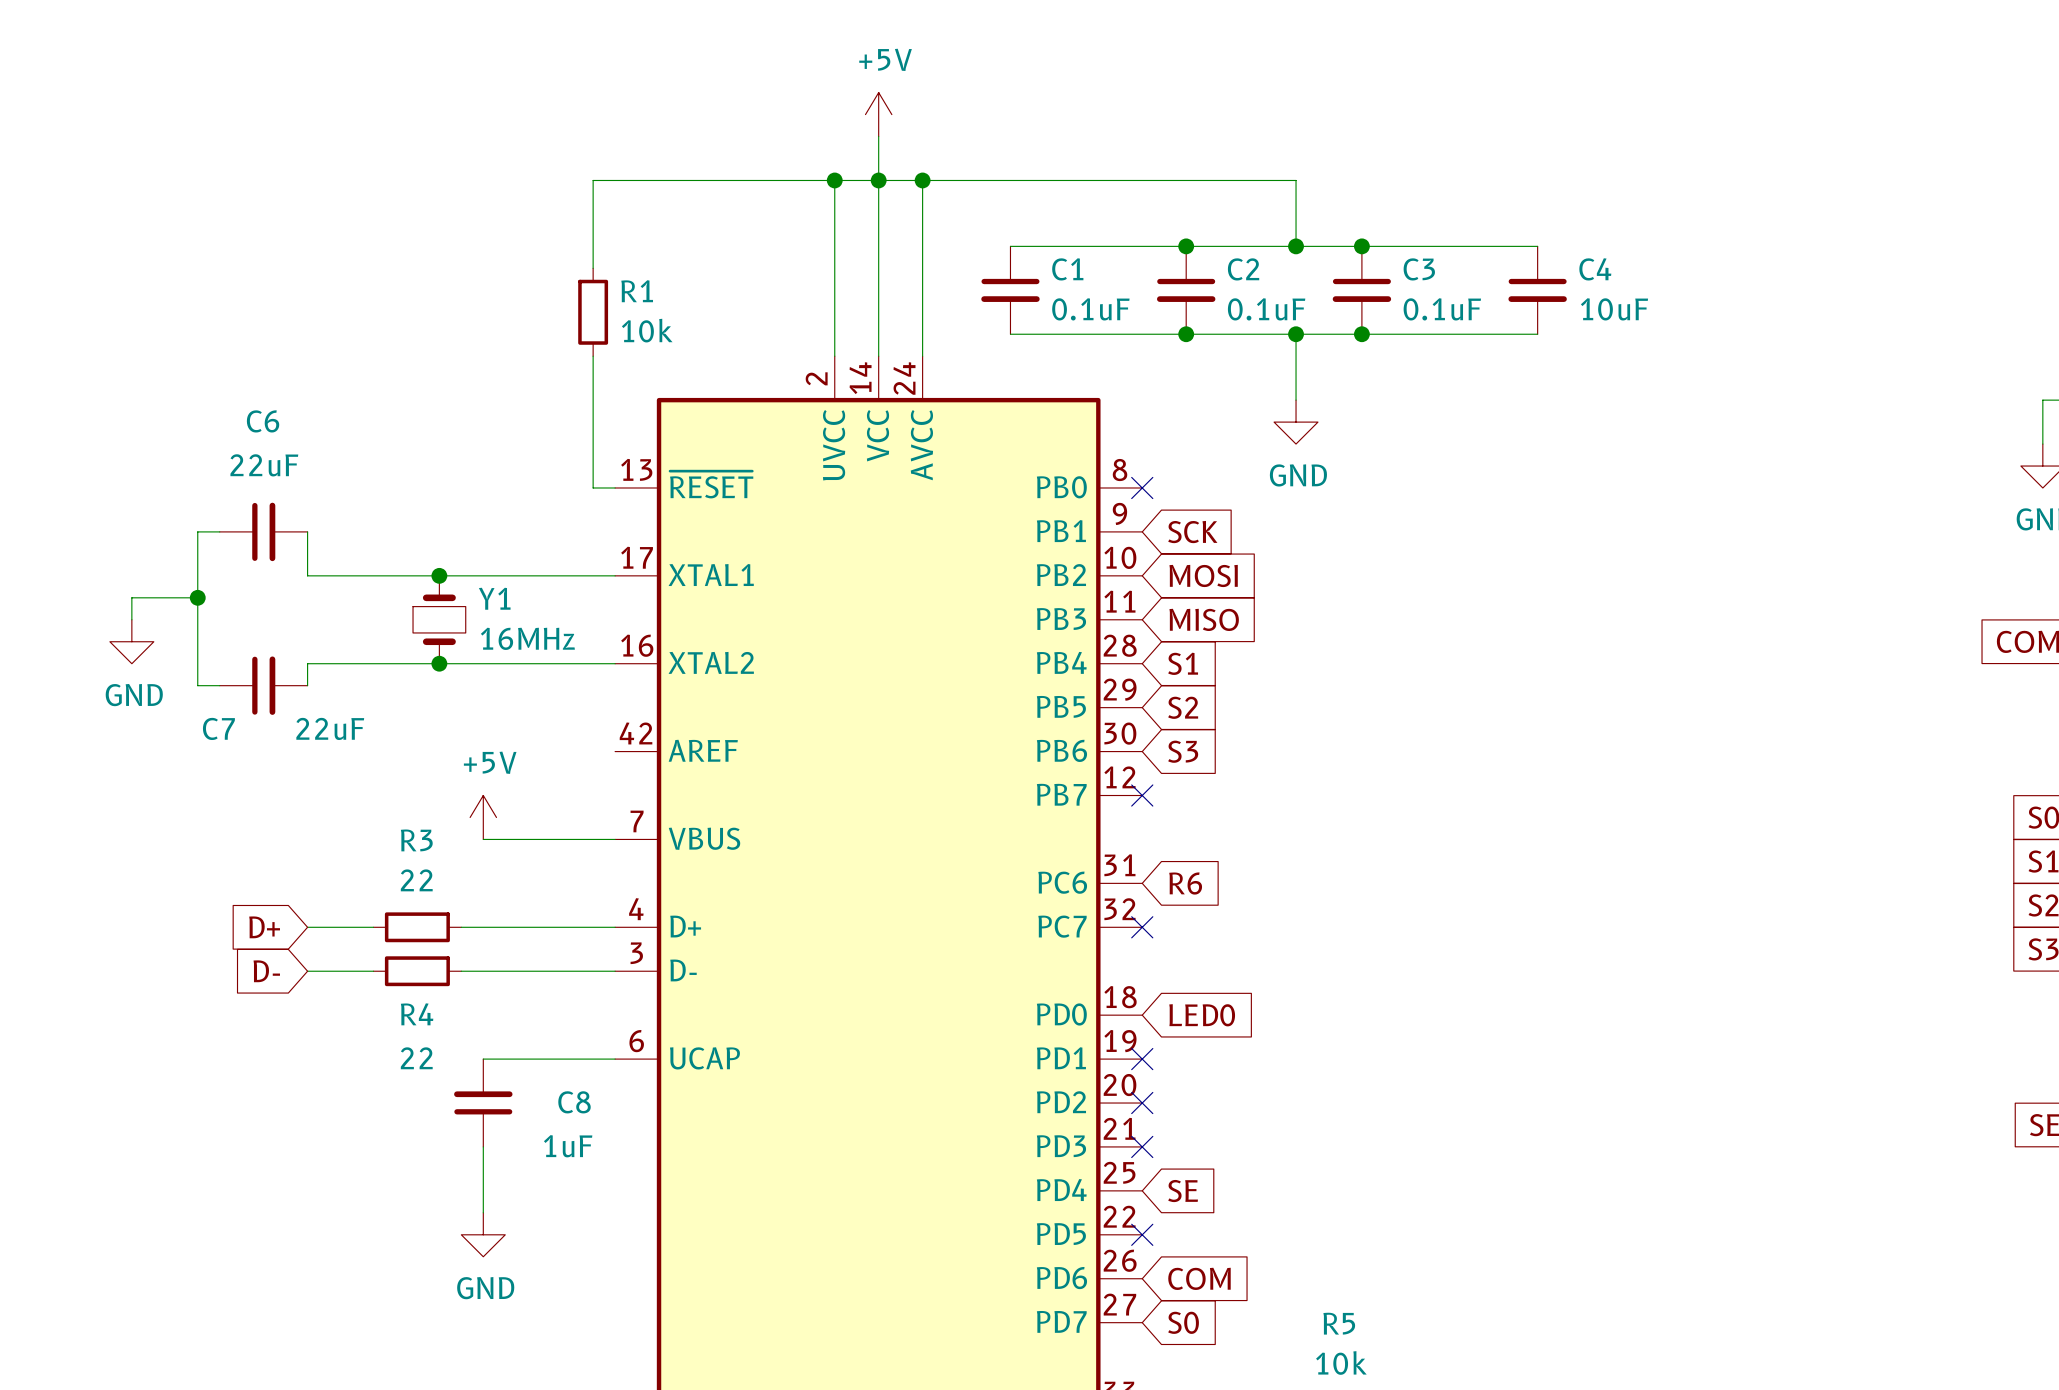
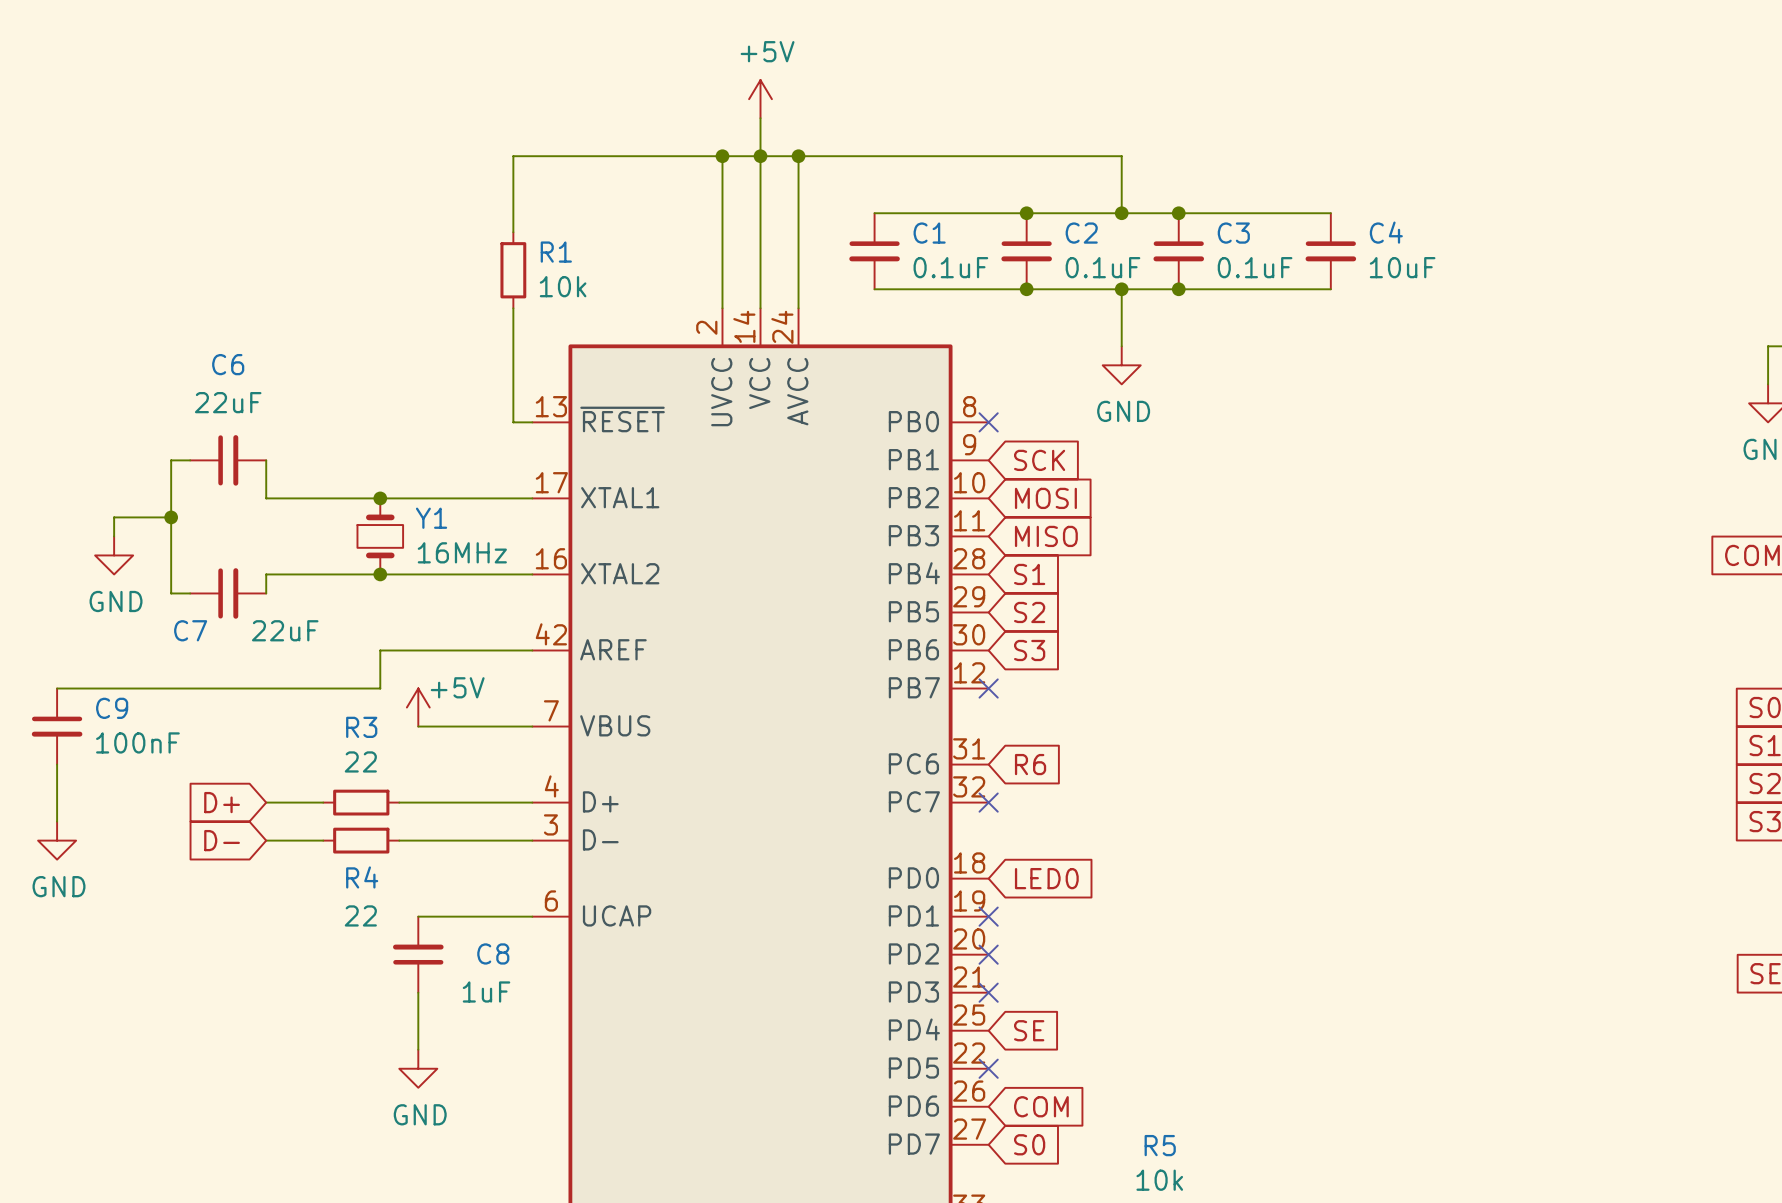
wire: none -> (532, 650) (380, 650) (380, 688) (57, 688)
power symbol text position: +5V (490, 762) -> +5V (457, 687)
C9: none -> 100nF (57, 726)
wire: none -> (57, 764) (57, 821)
power symbol: none -> GND (57, 840)

